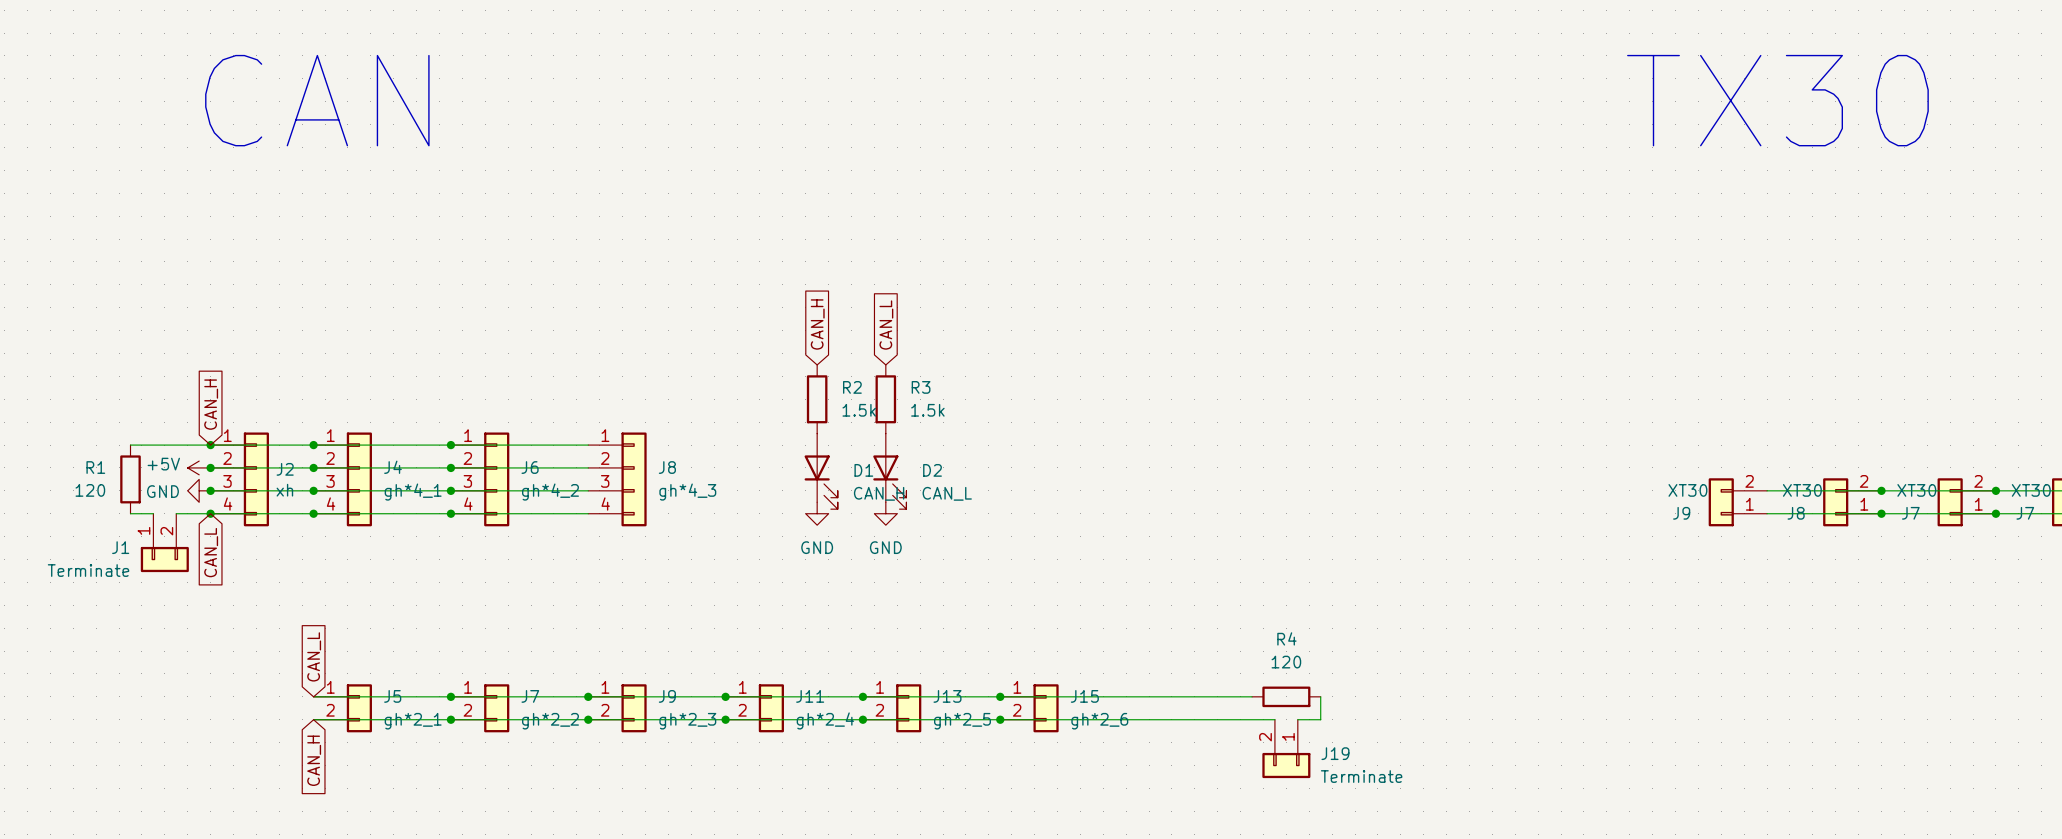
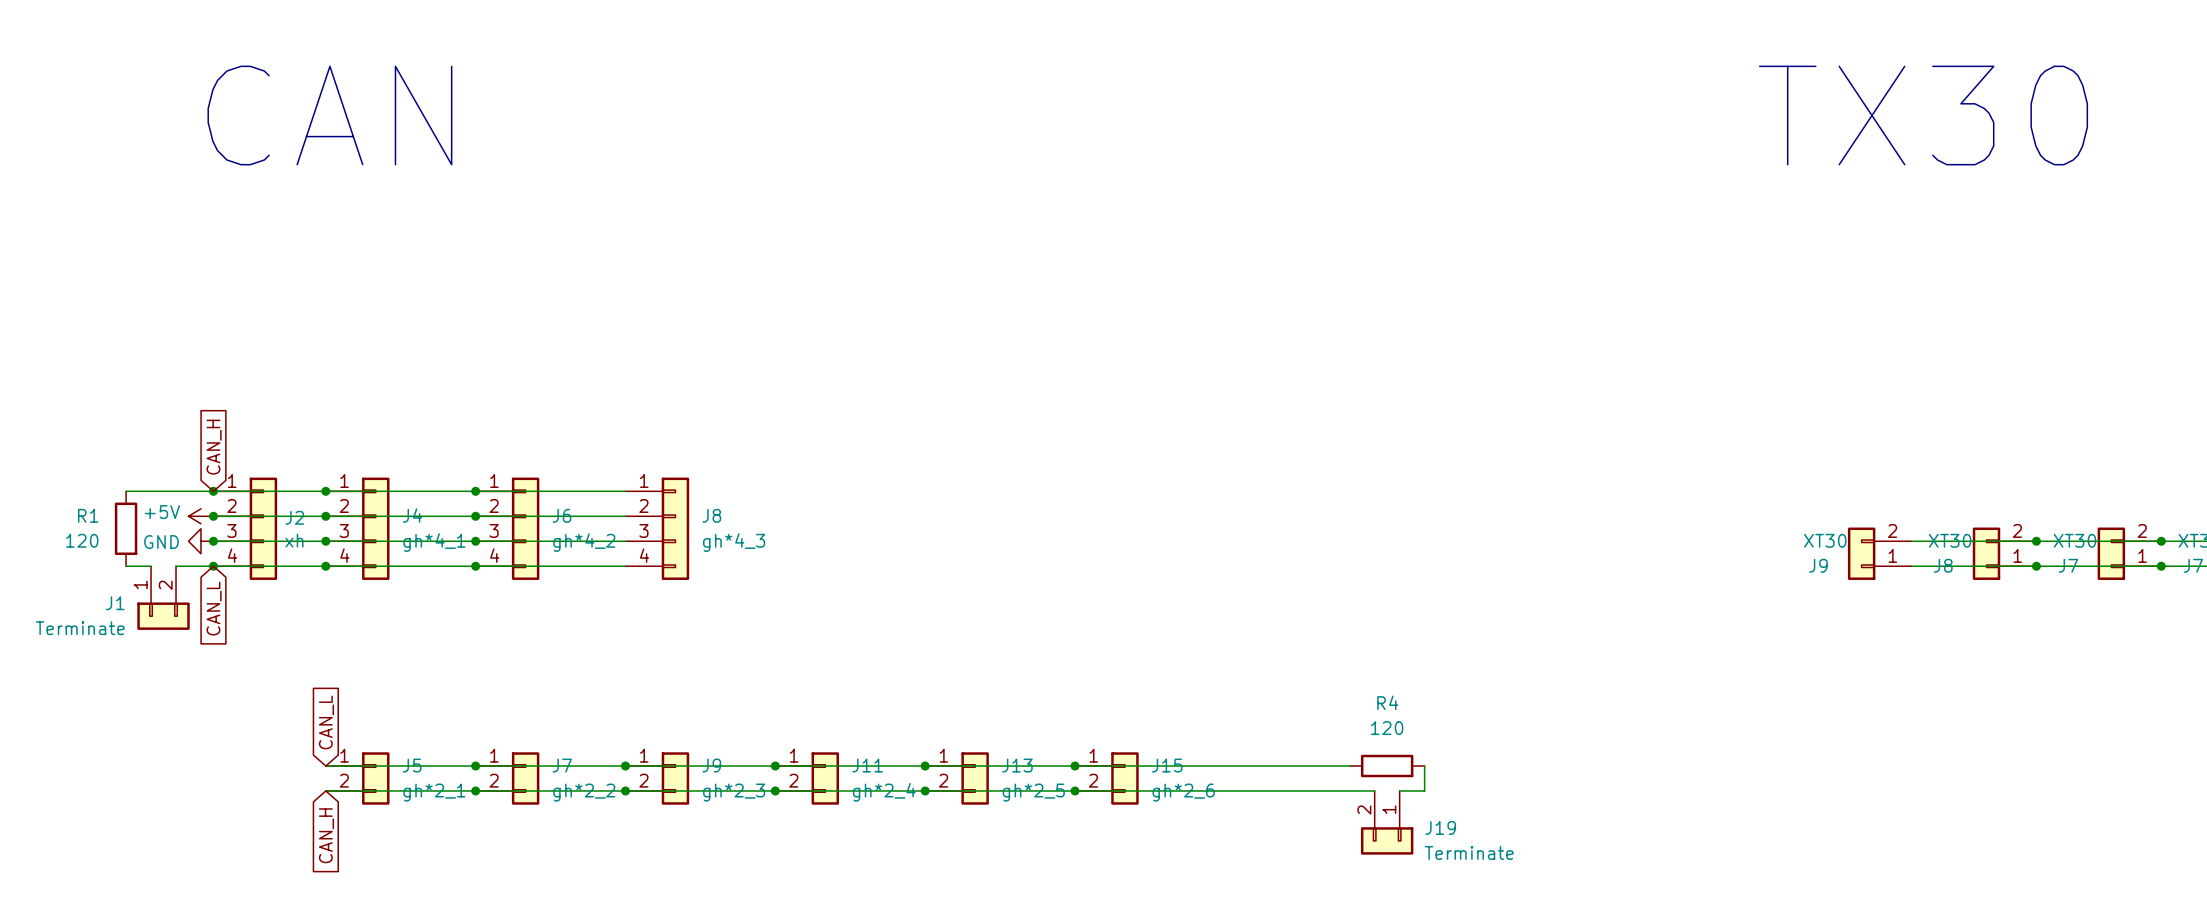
global label: CAN_H (817, 324) -> none
global label: CAN_L (886, 325) -> none
R2: 1.5k (817, 399) -> none
R3: 1.5k (885, 399) -> none
D1: CAN_H (821, 471) -> none
D2: CAN_L (889, 471) -> none
power symbol: GND (817, 513) -> none
power symbol: GND (885, 513) -> none

